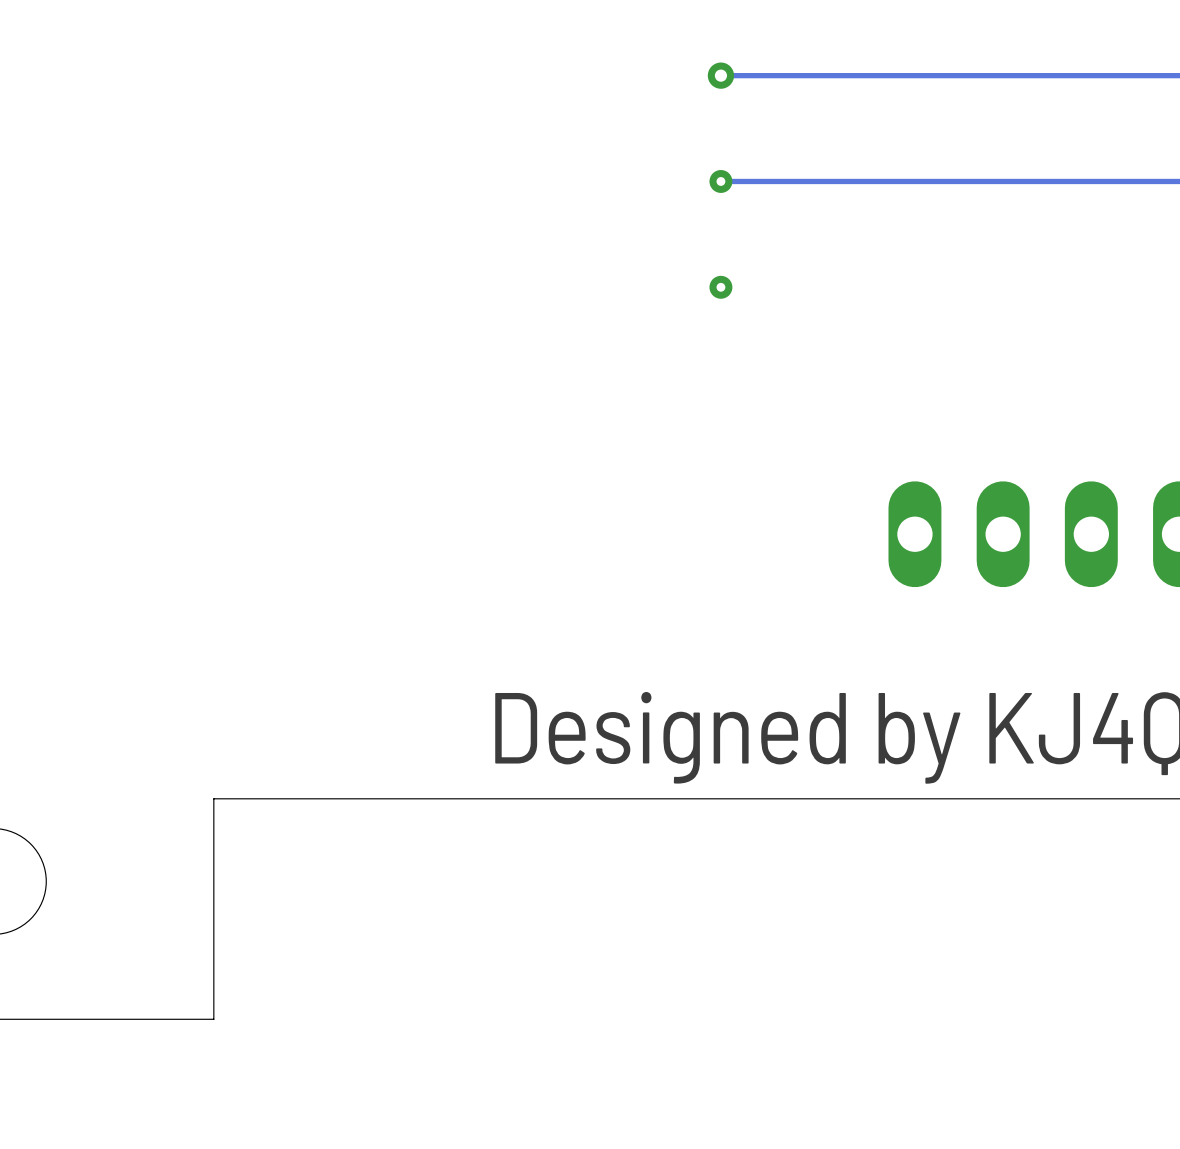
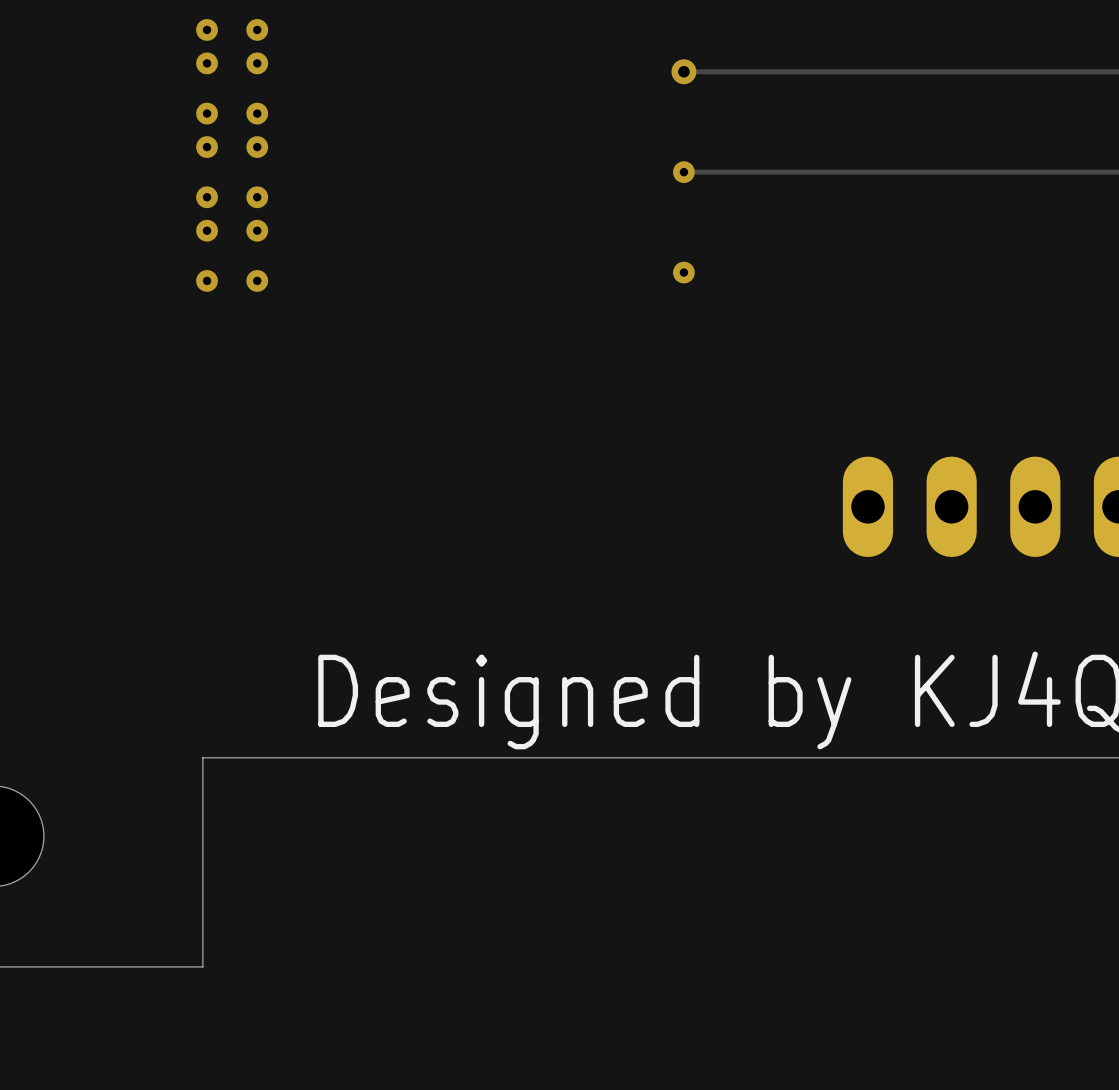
via: none -> (207, 29)
via: none -> (257, 29)
via: none -> (207, 63)
via: none -> (257, 63)
via: none -> (207, 113)
via: none -> (257, 113)
via: none -> (207, 147)
via: none -> (257, 147)
via: none -> (207, 197)
via: none -> (257, 197)
via: none -> (207, 230)
via: none -> (257, 230)
via: none -> (207, 280)
via: none -> (257, 280)

